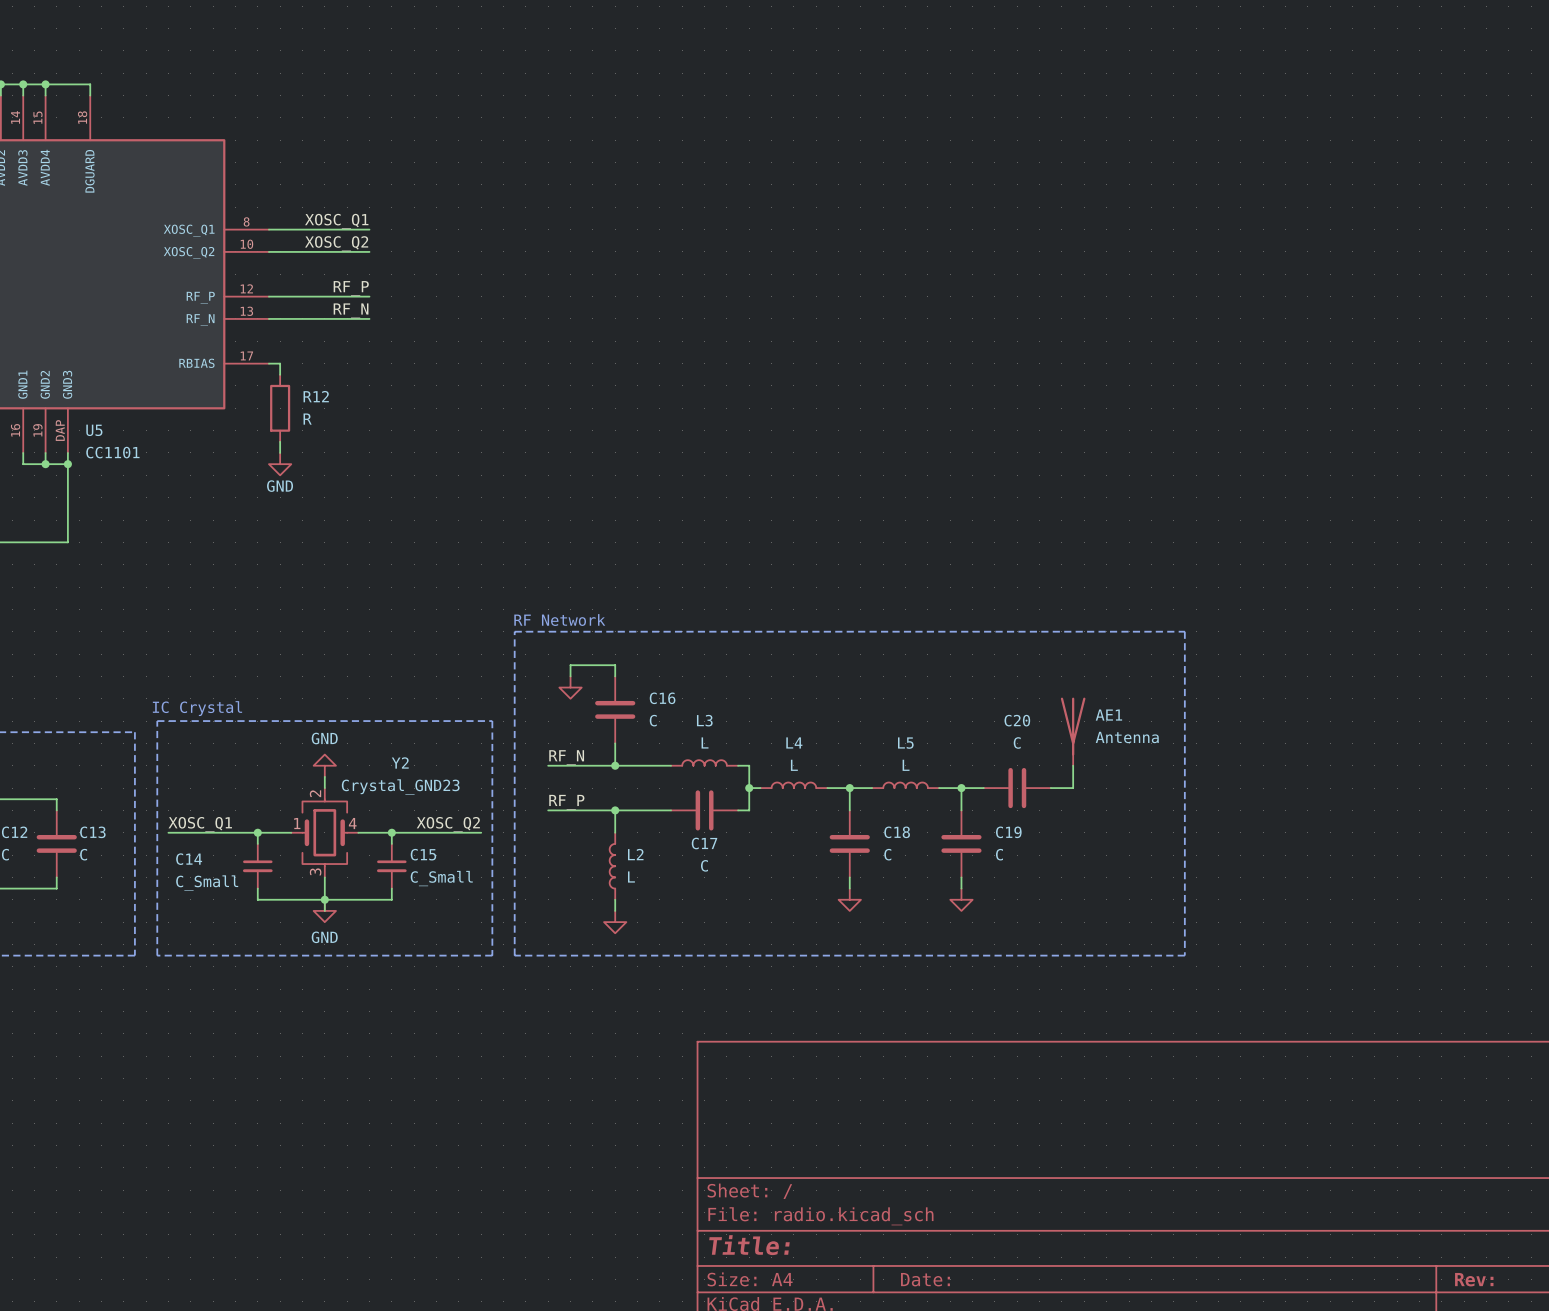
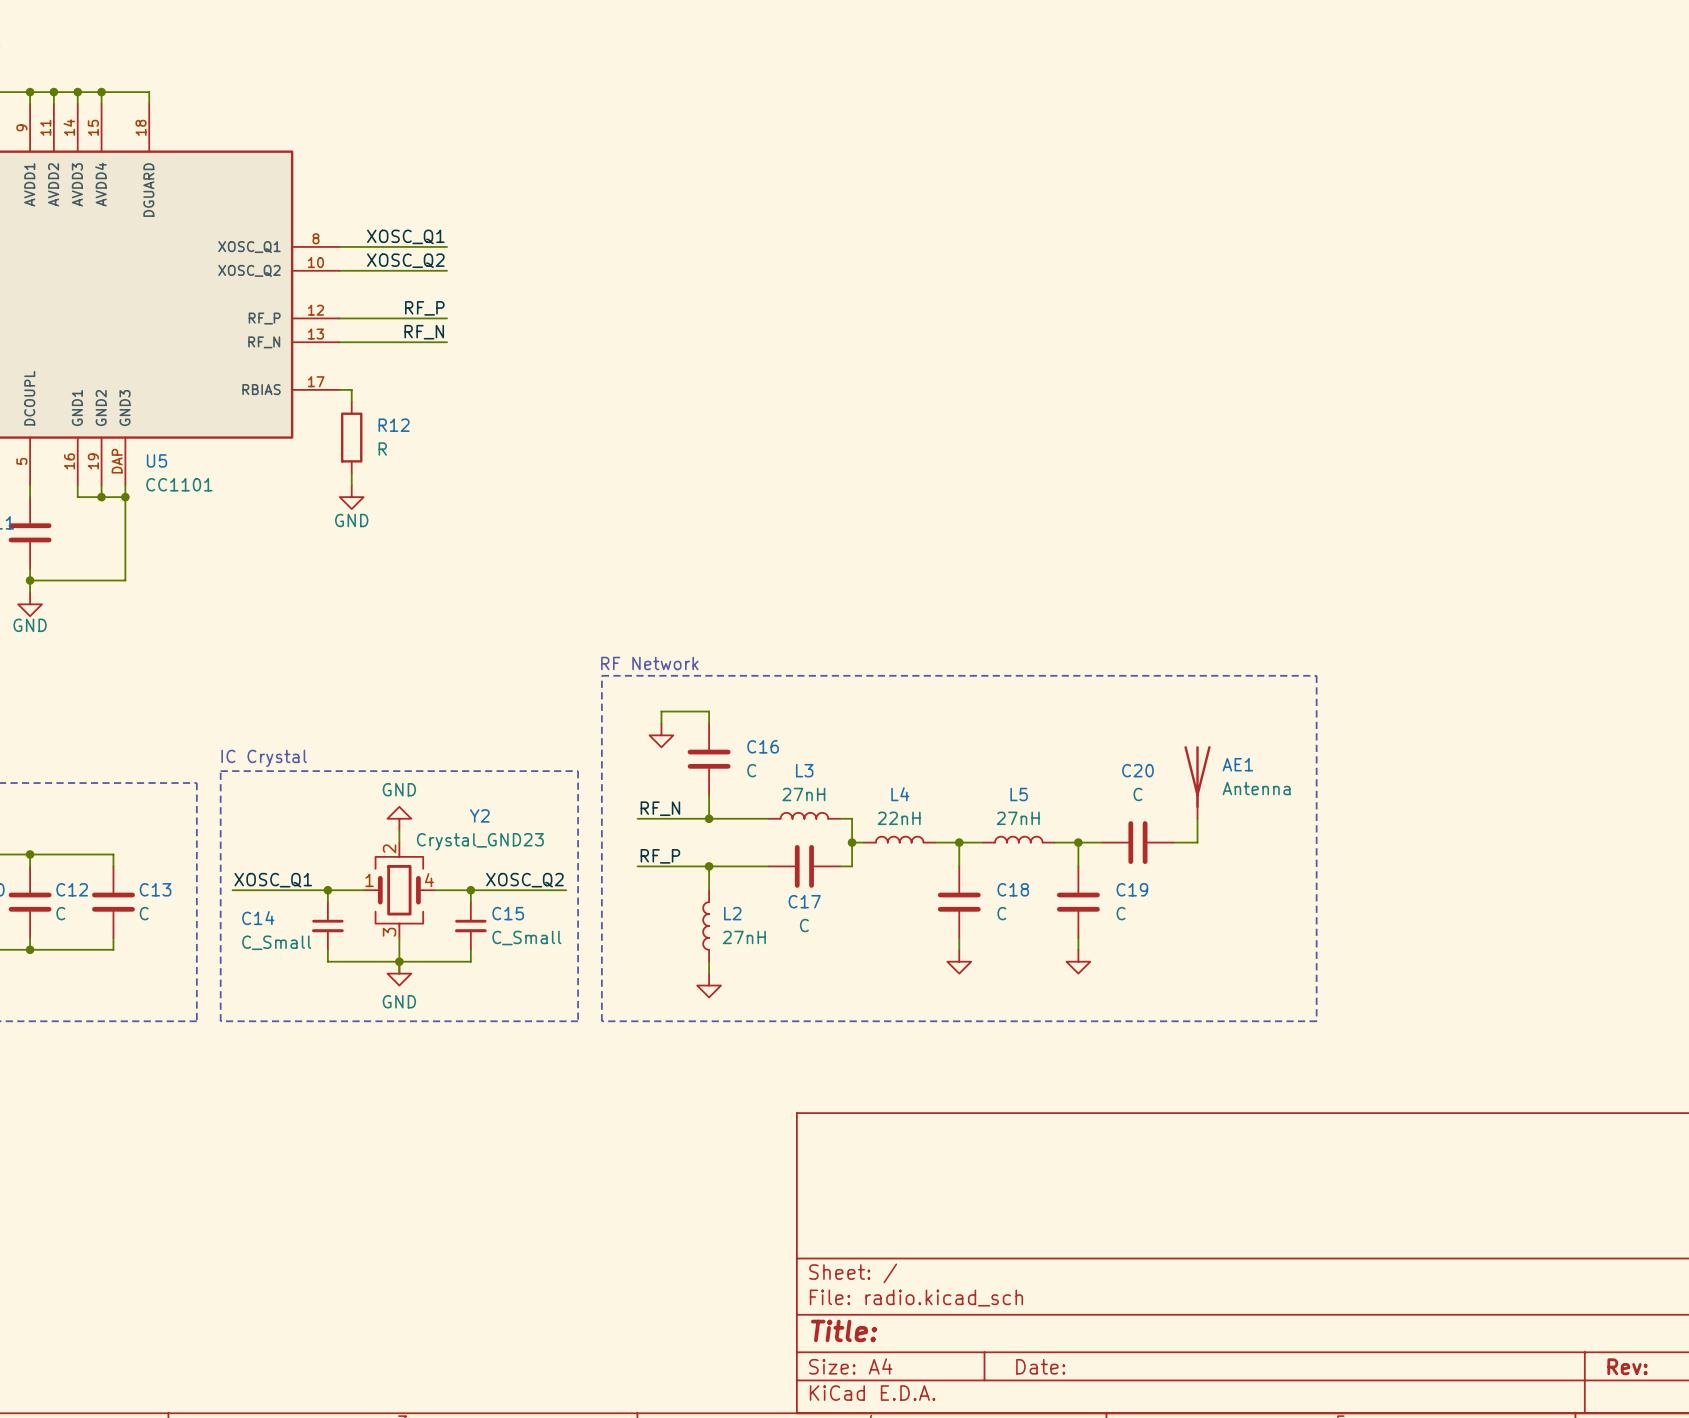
L3 value: L (705, 742) -> 27nH (803, 794)
L4 value: L (794, 765) -> 22nH (899, 818)
L5 value: L (906, 765) -> 27nH (1018, 818)
L2 value: L (631, 877) -> 27nH (744, 937)

